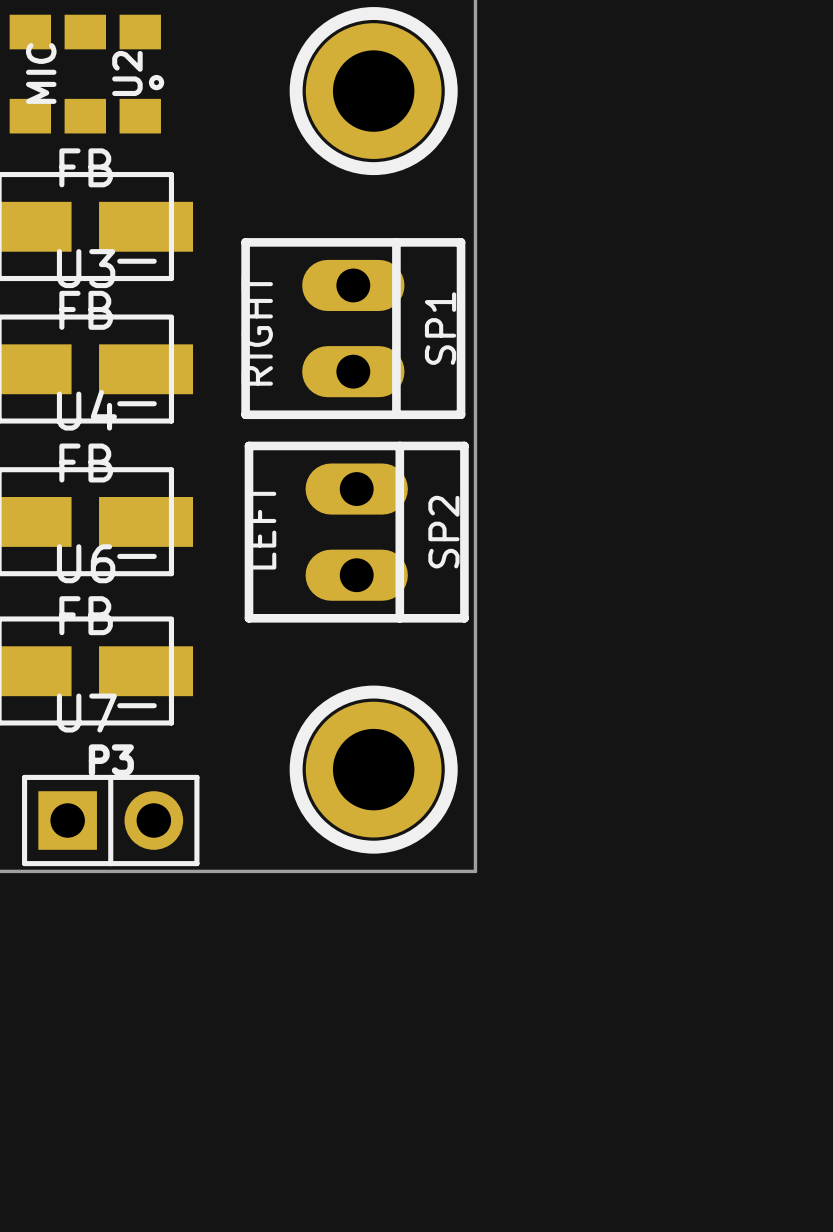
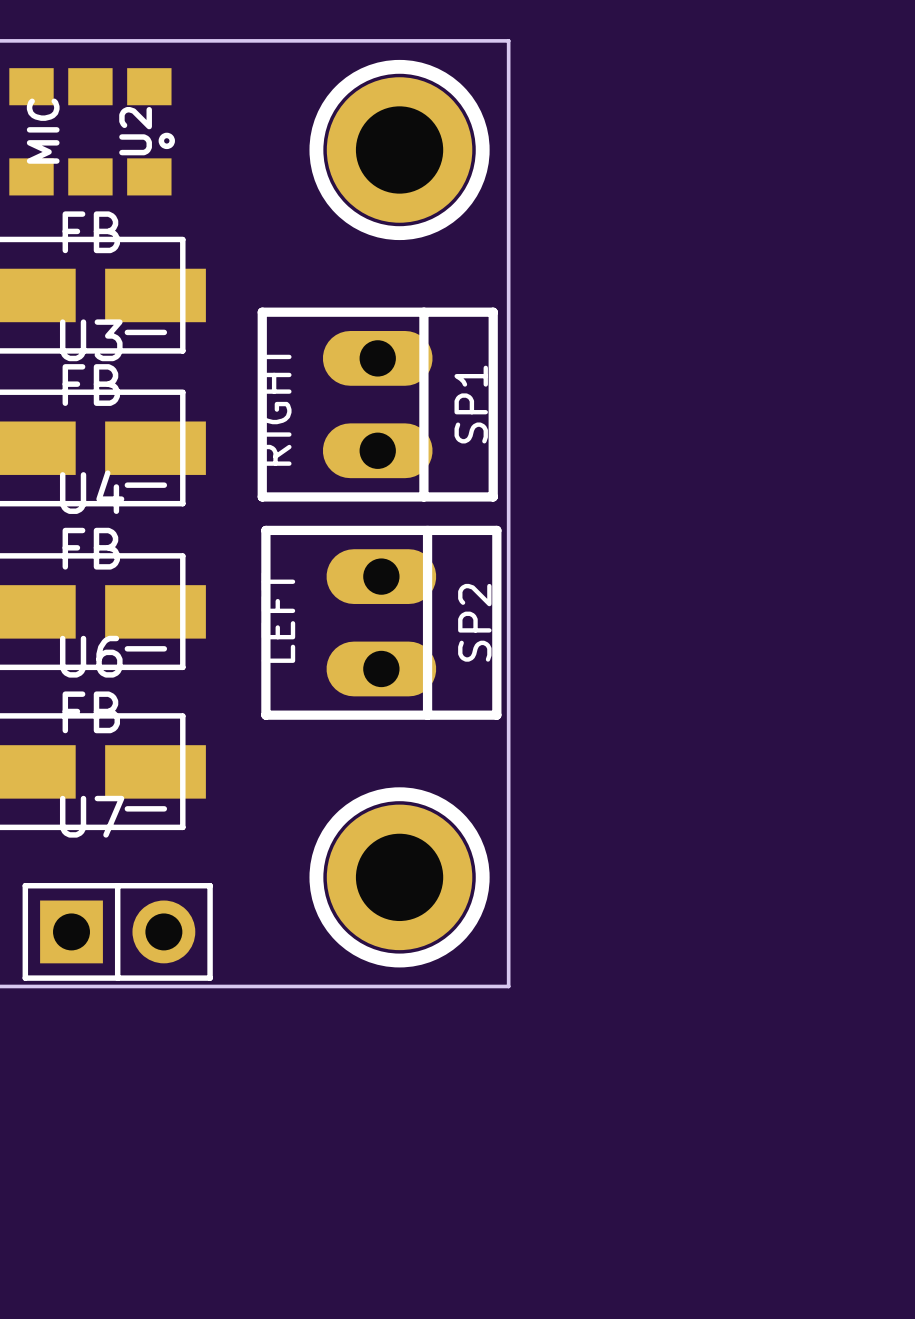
P3 name: P3 (111, 760) -> none

